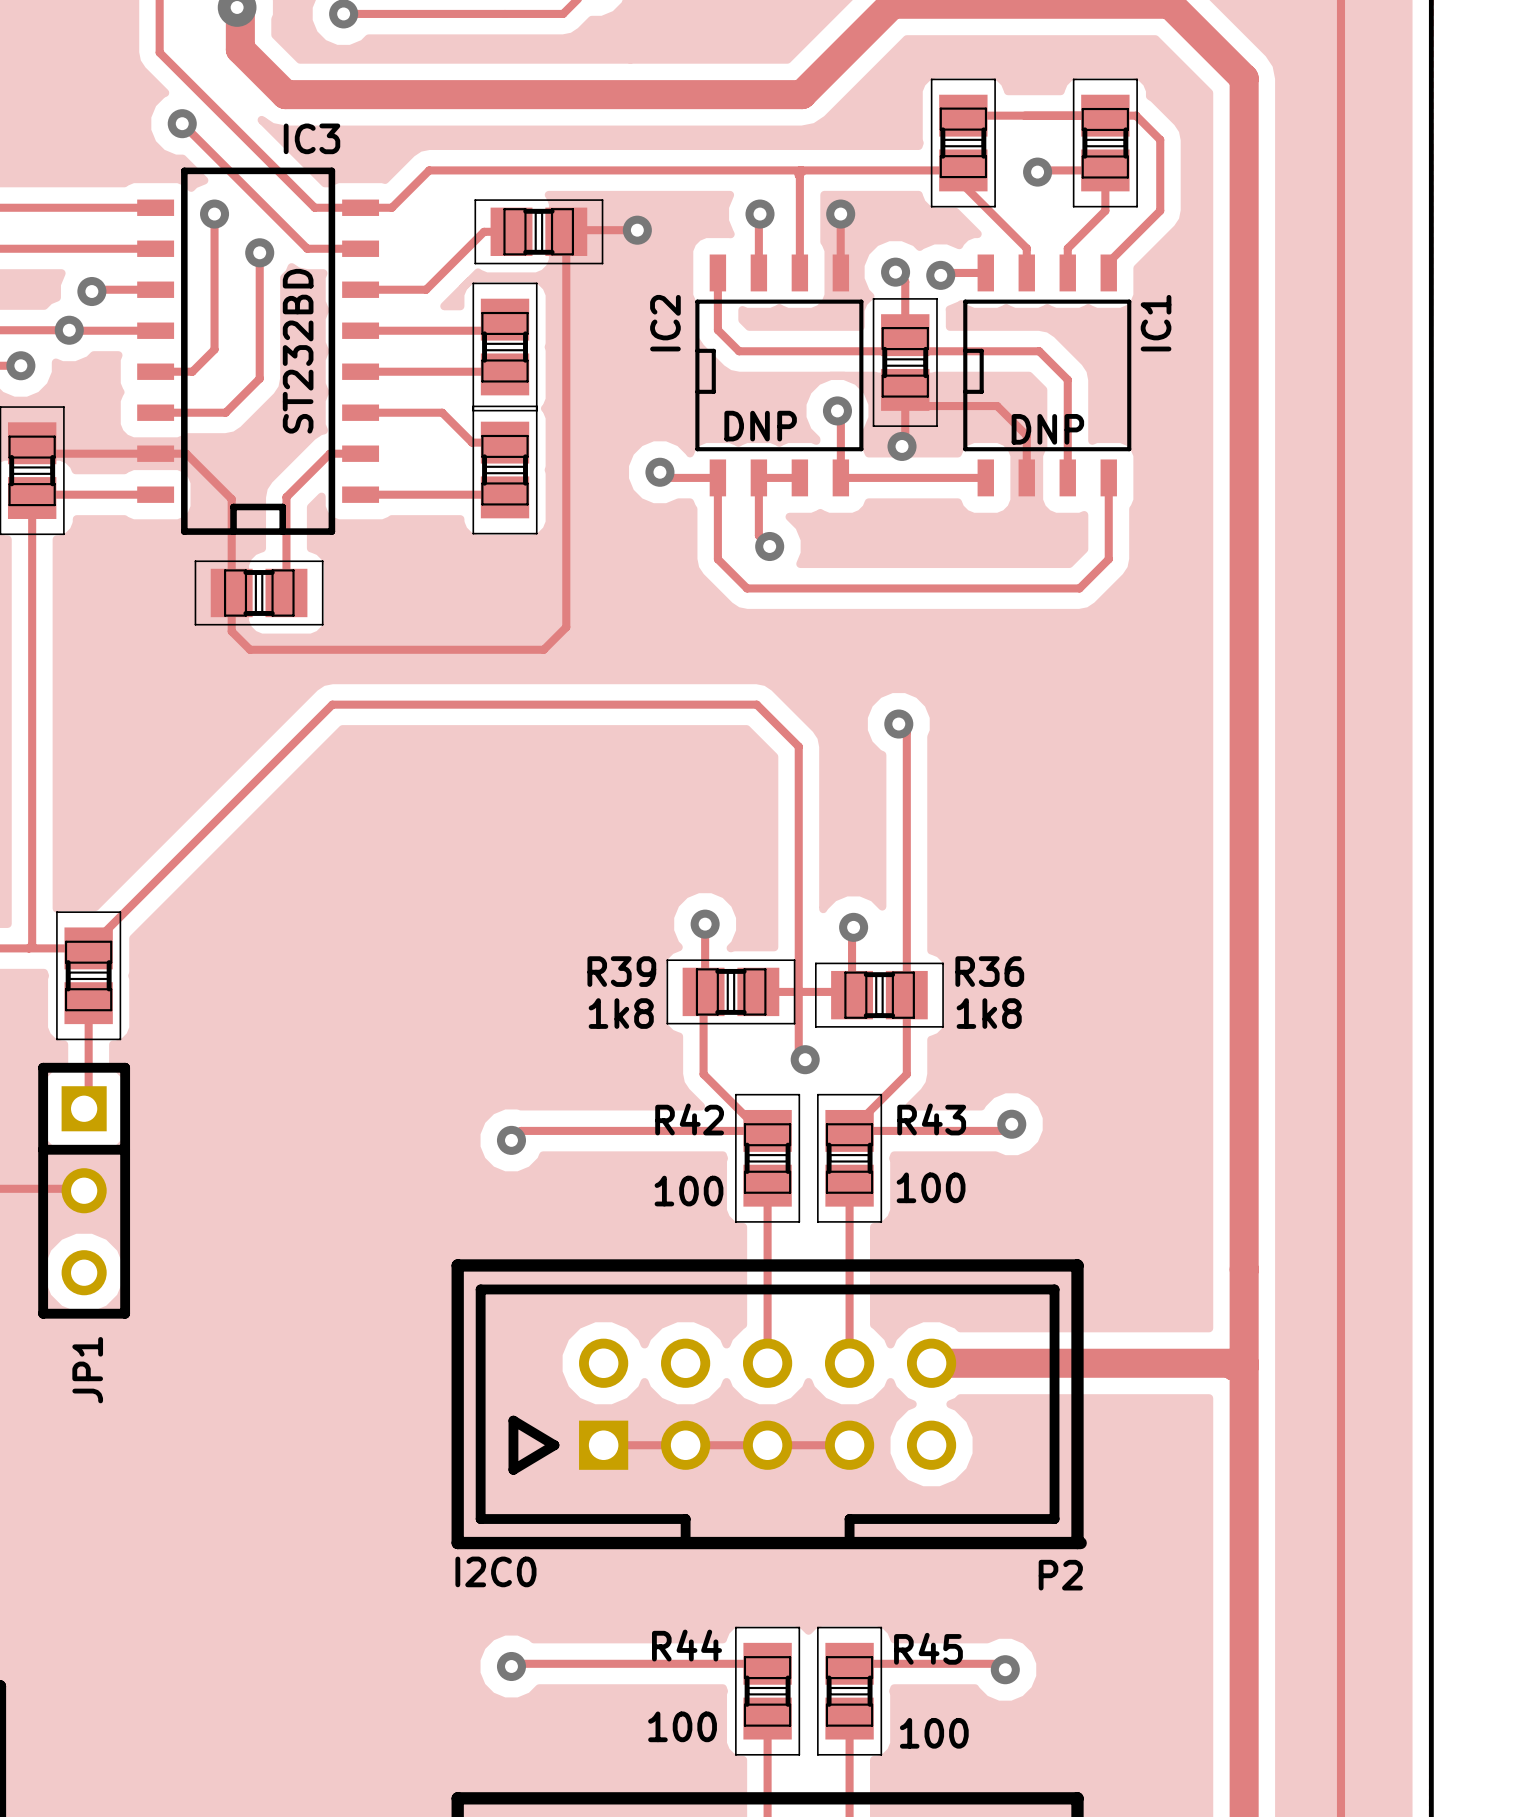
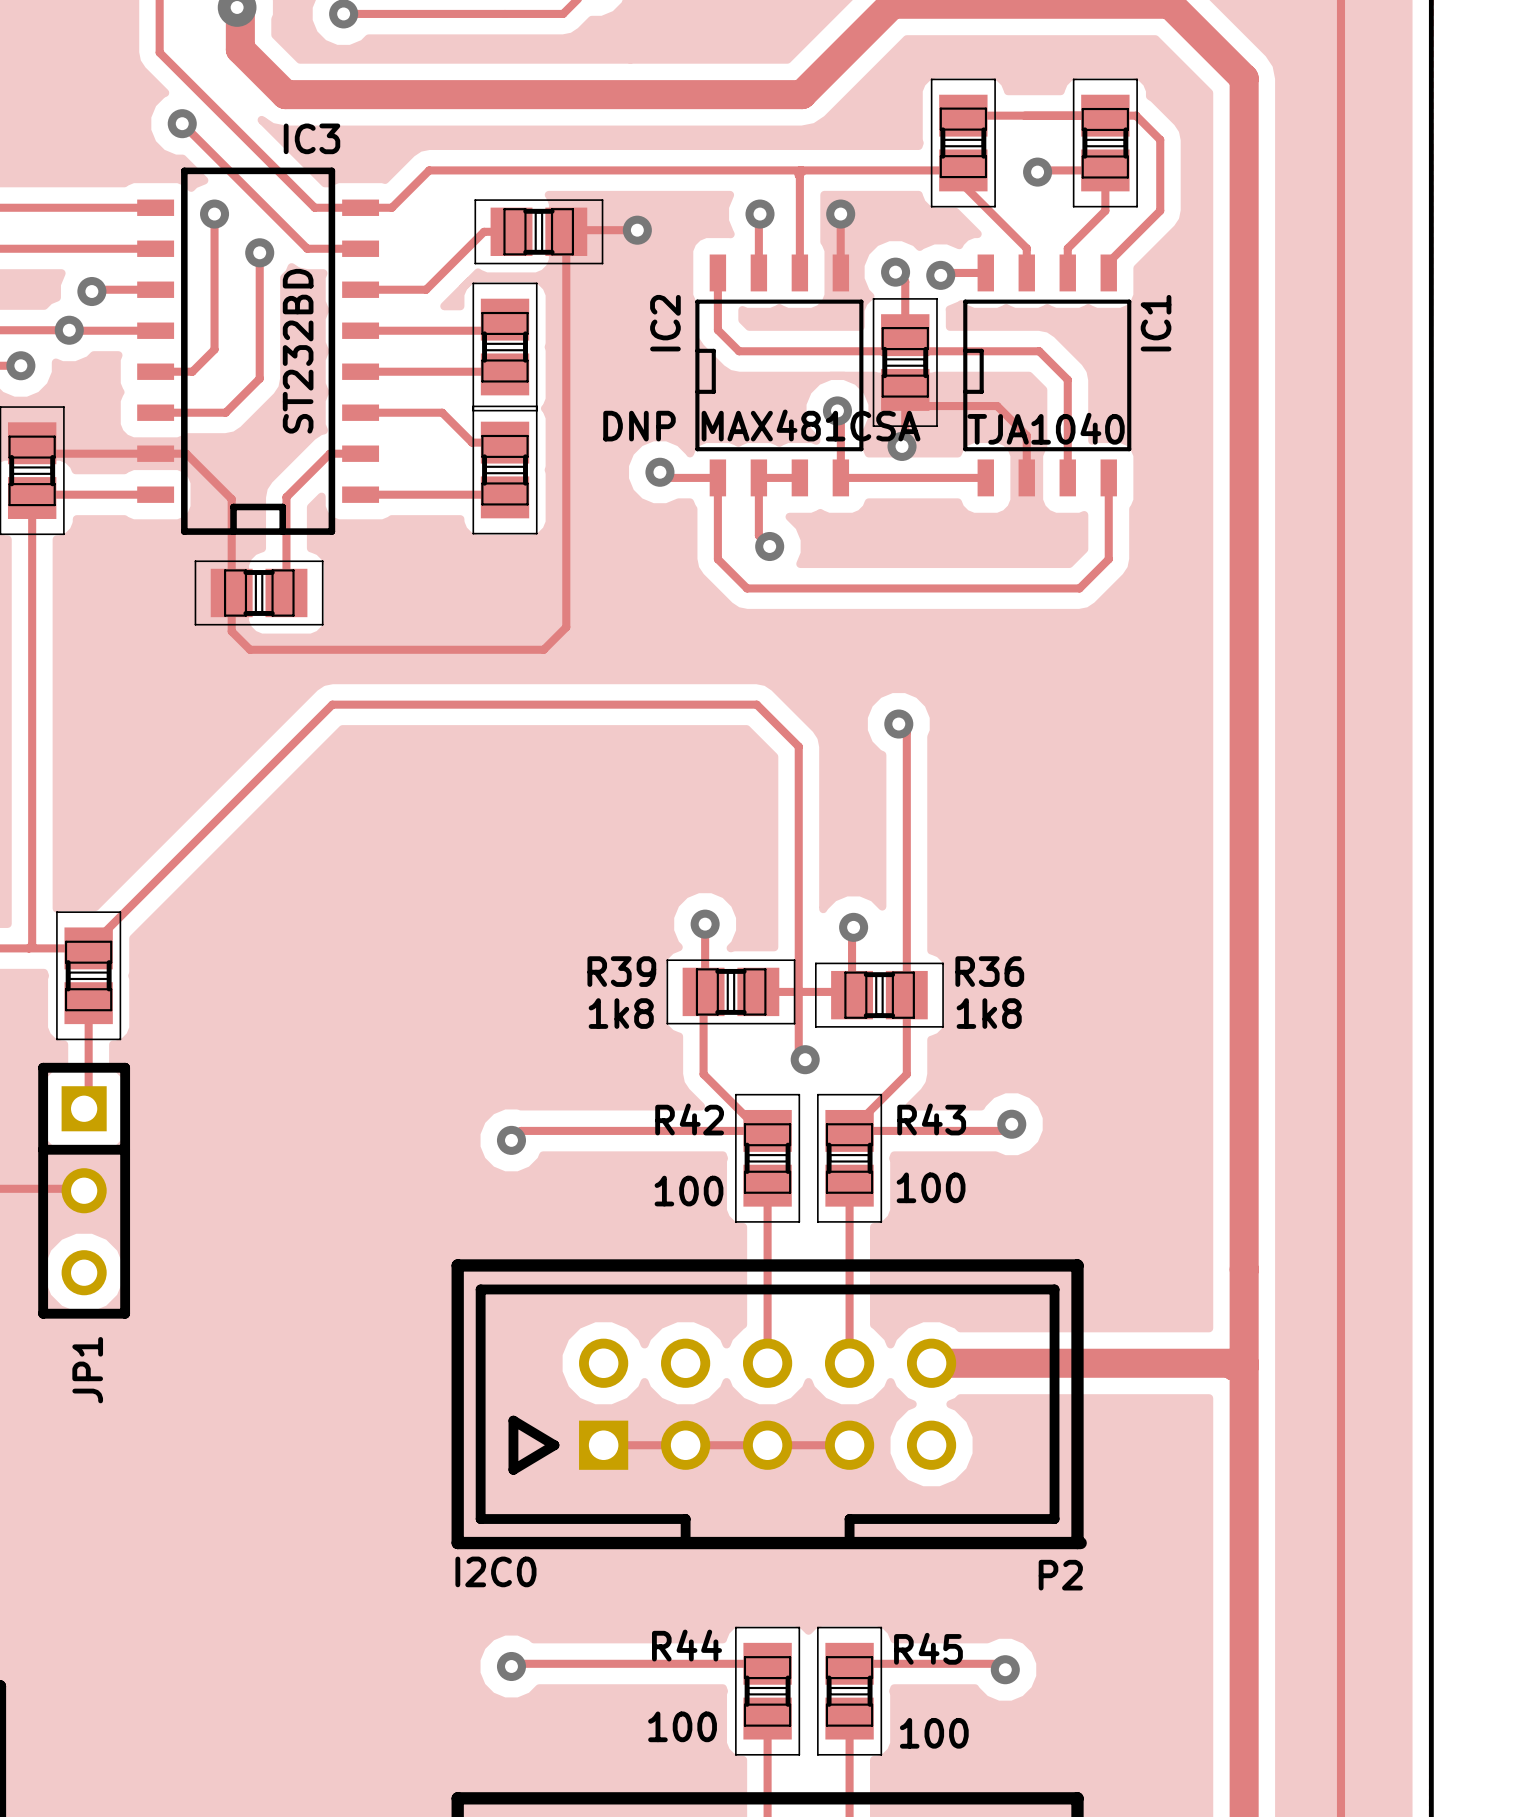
IC2 value: DNP (760, 426) -> DNP MAX481CSA (761, 425)
IC1 value: DNP (1047, 429) -> TJA1040 (1046, 428)

